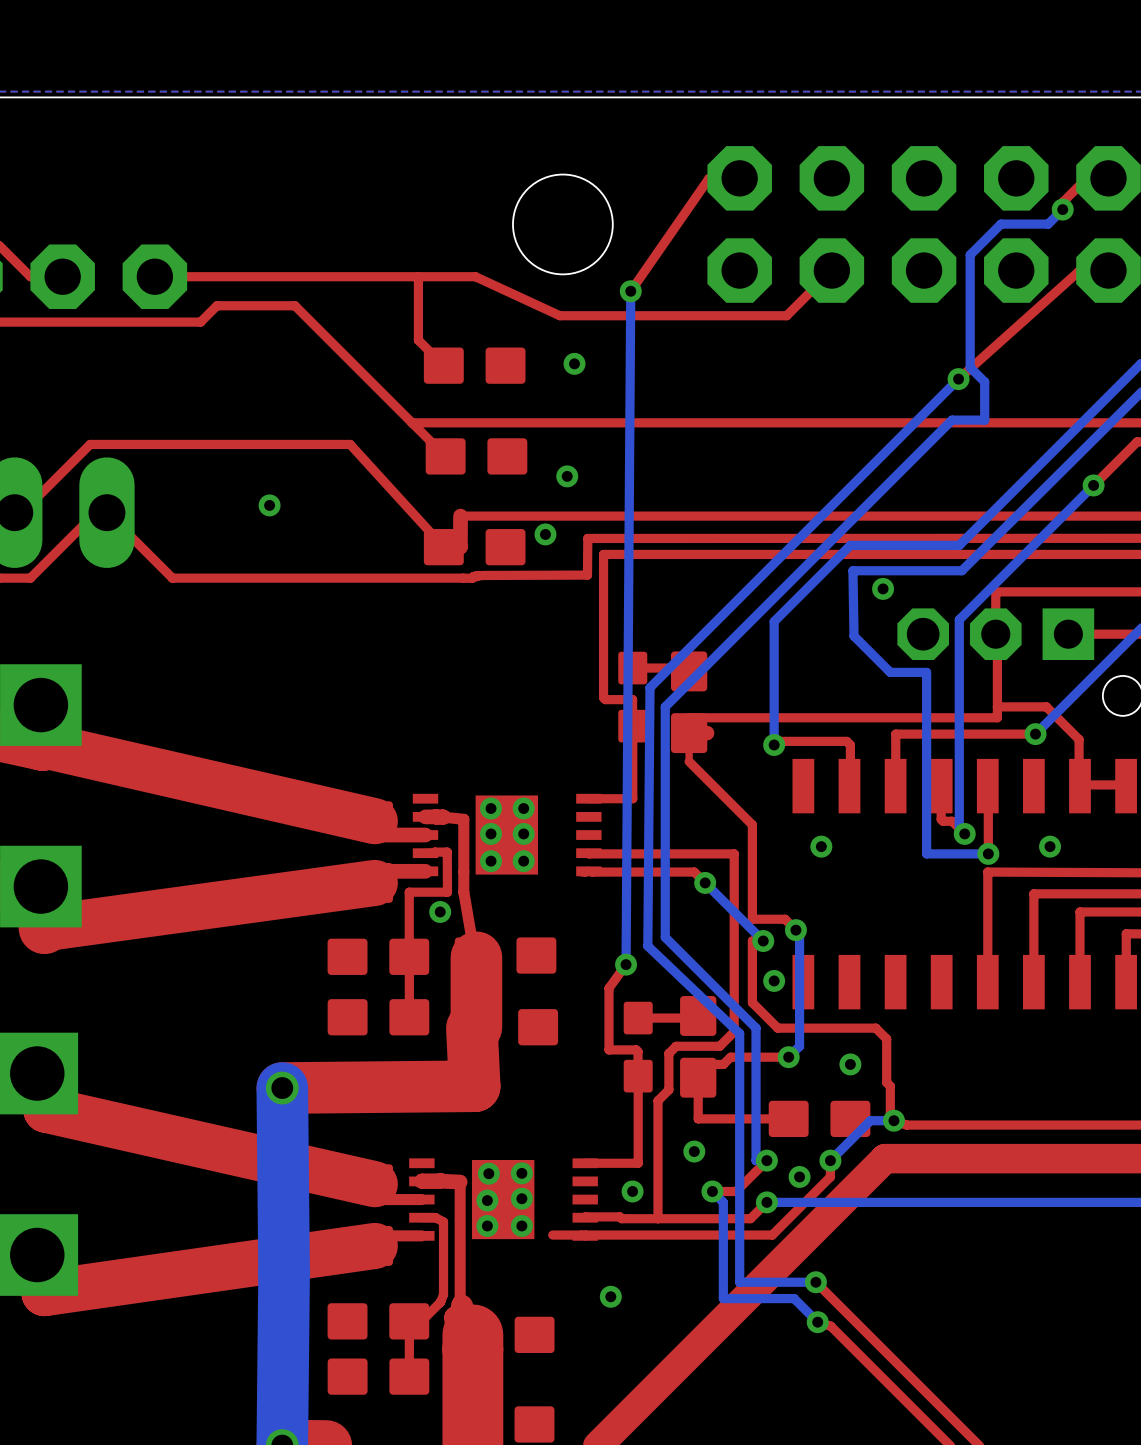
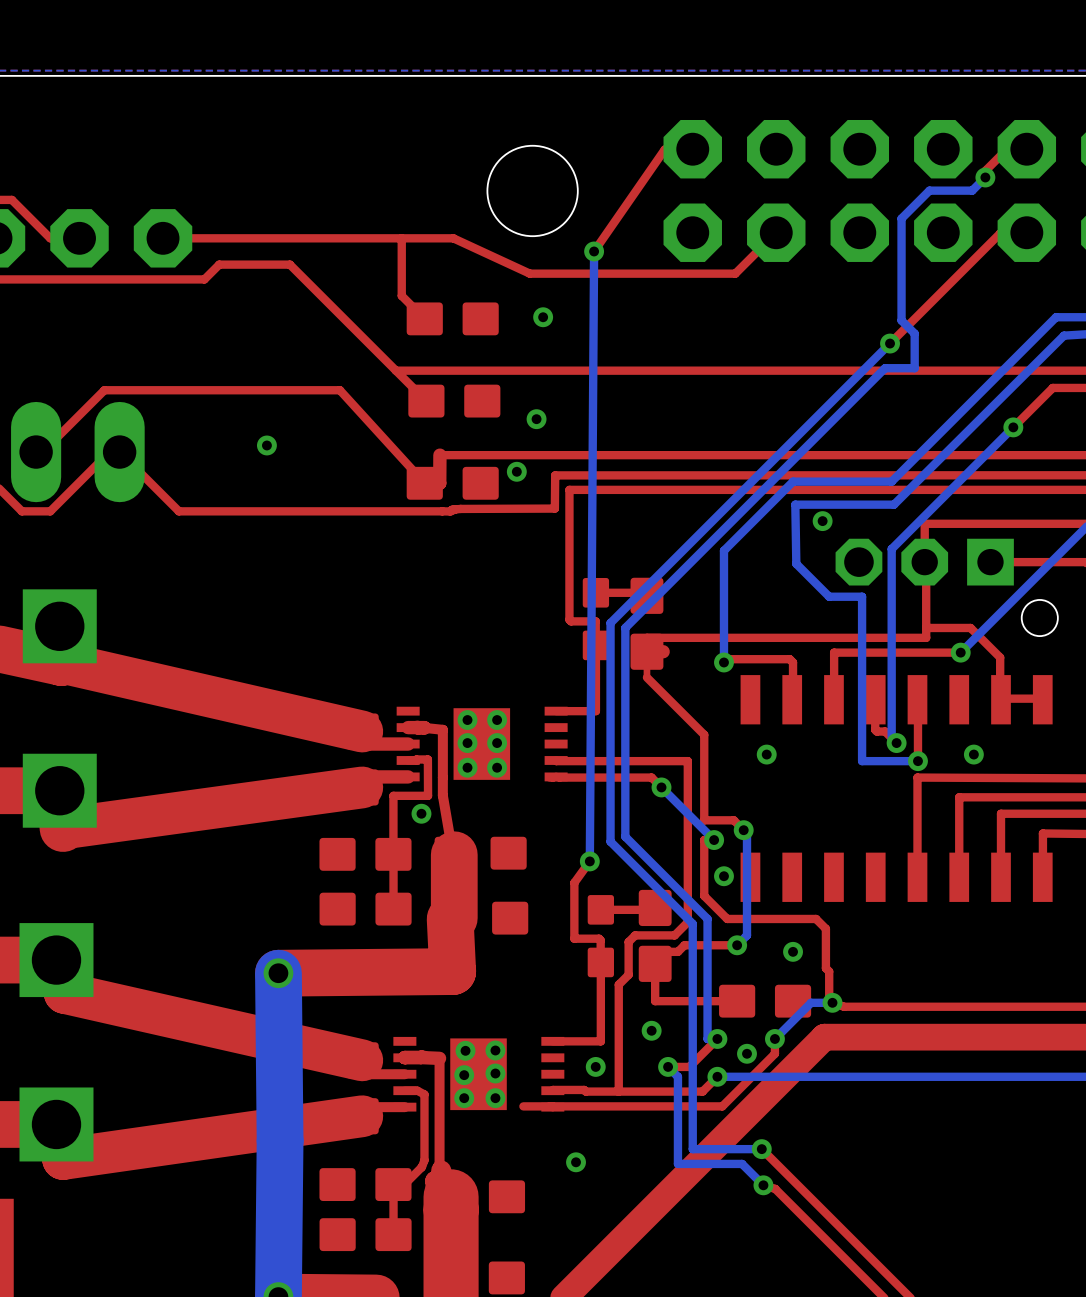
top track: (1079, 271) (958, 379) -> (1000, 233) (890, 343)
bottom track: (958, 379) (650, 687) (647, 946) (739, 1033) -> (890, 343) (610, 623) (610, 841) (692, 923)
via position: (958, 379) -> (890, 343)

